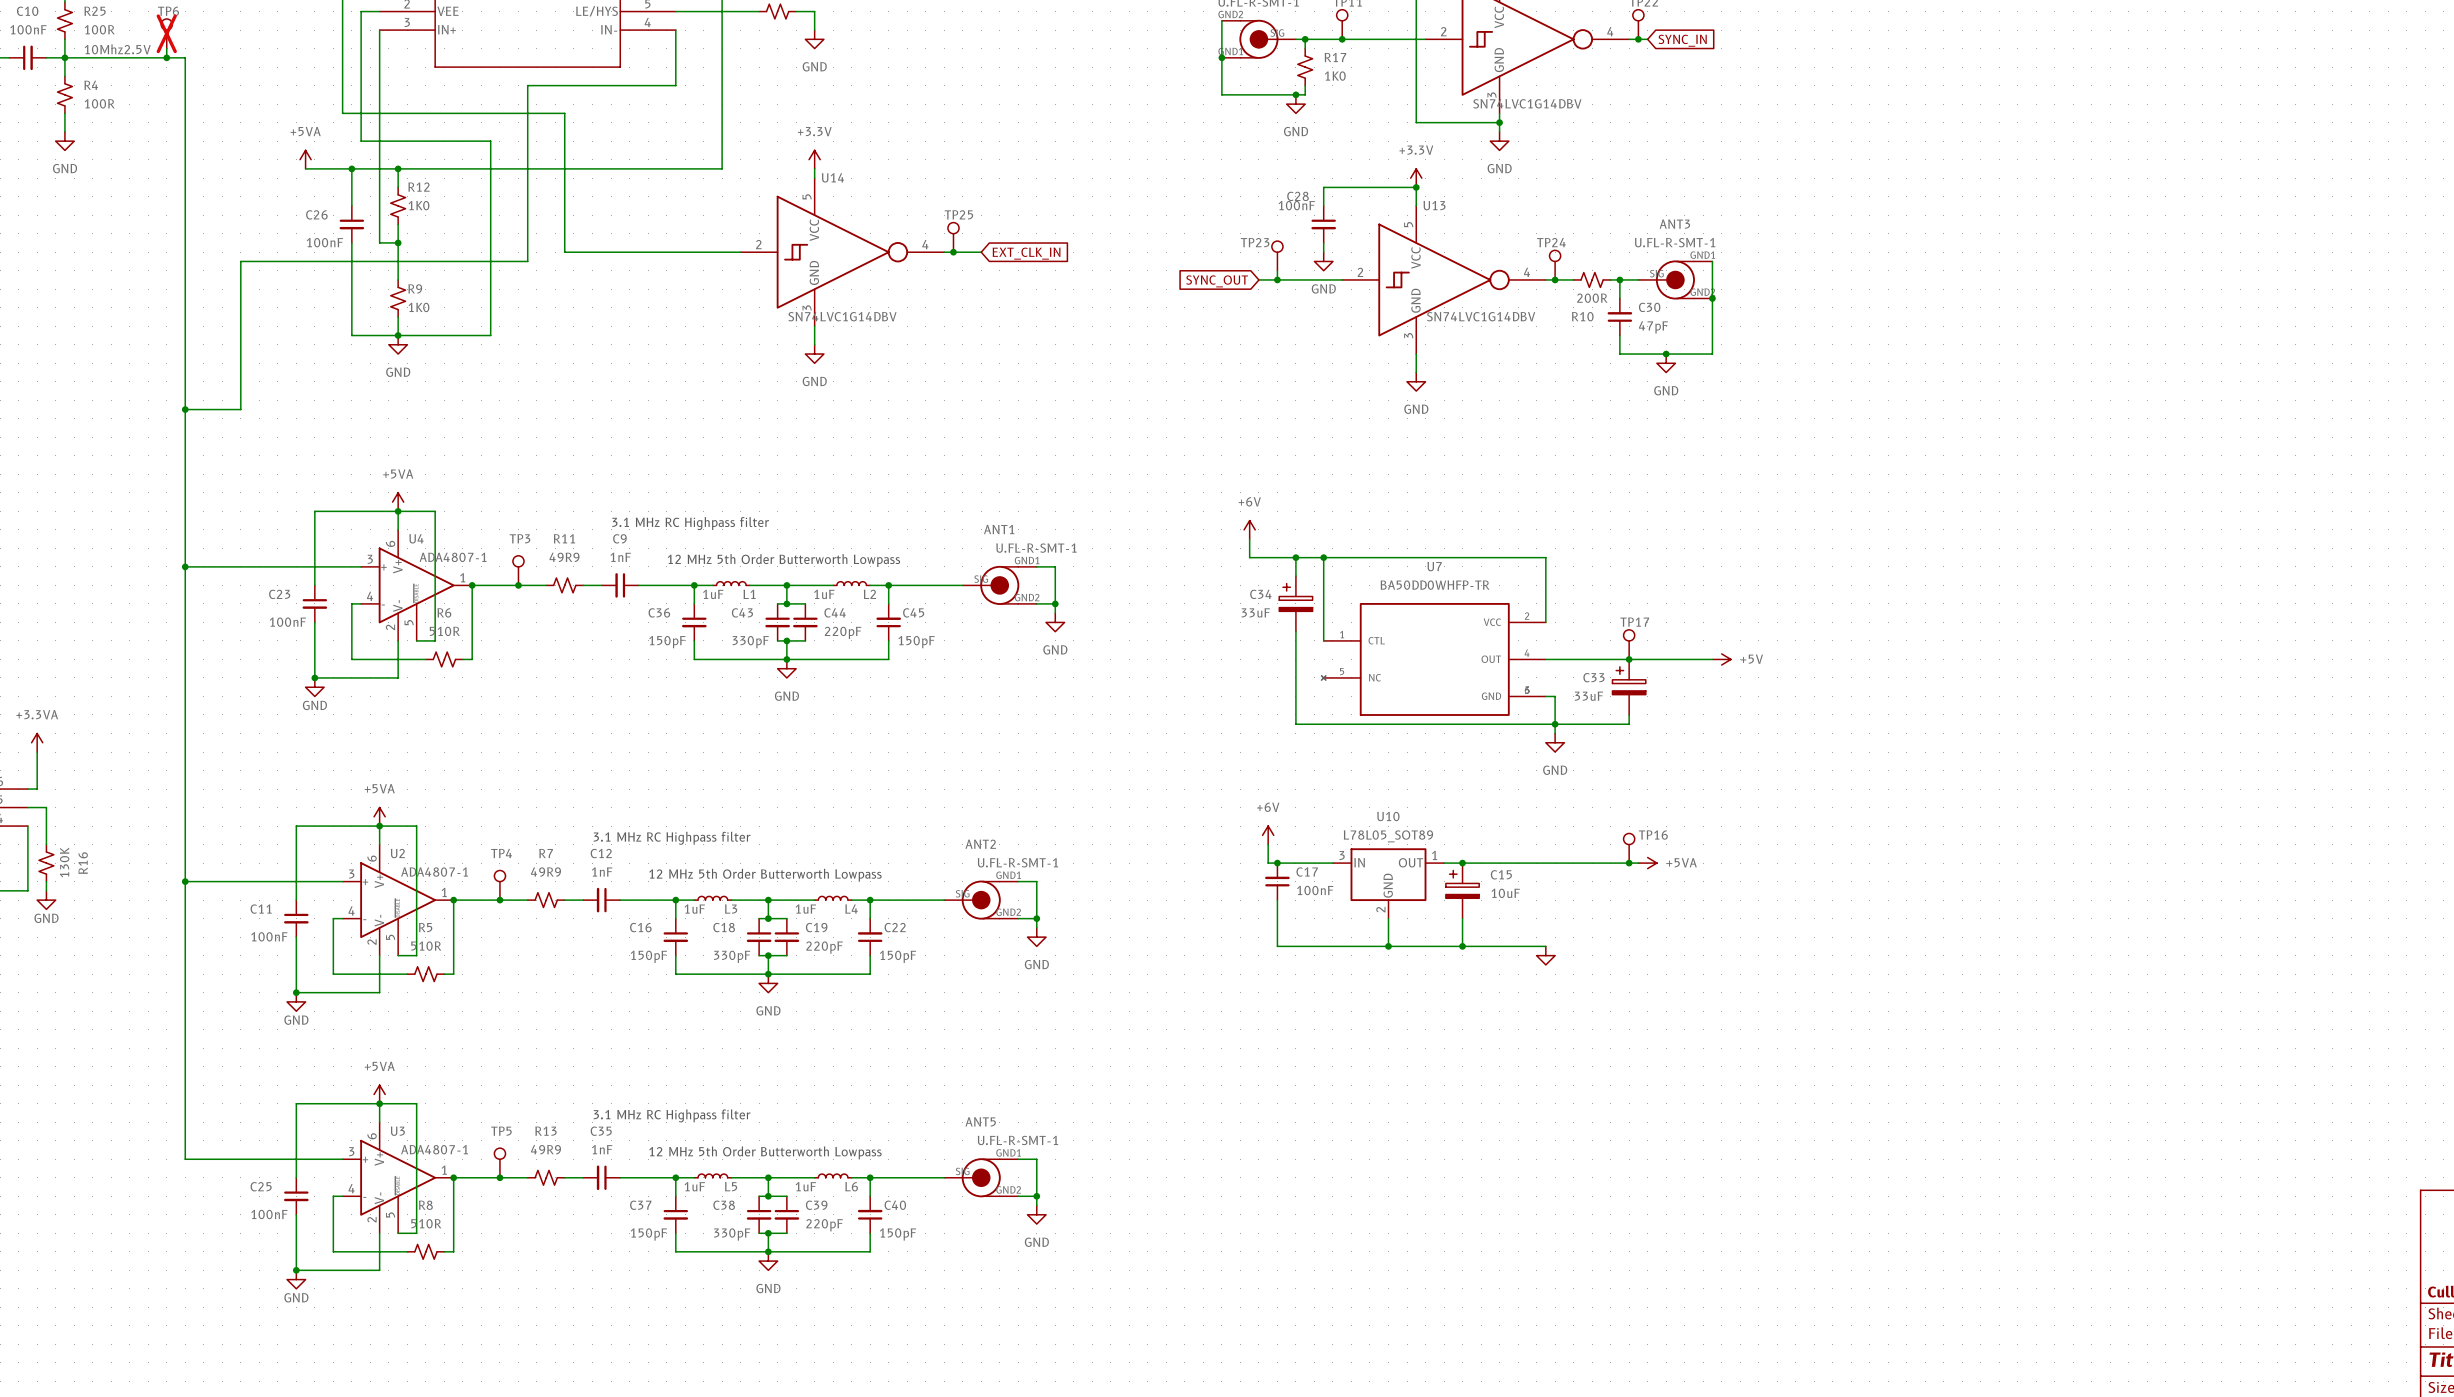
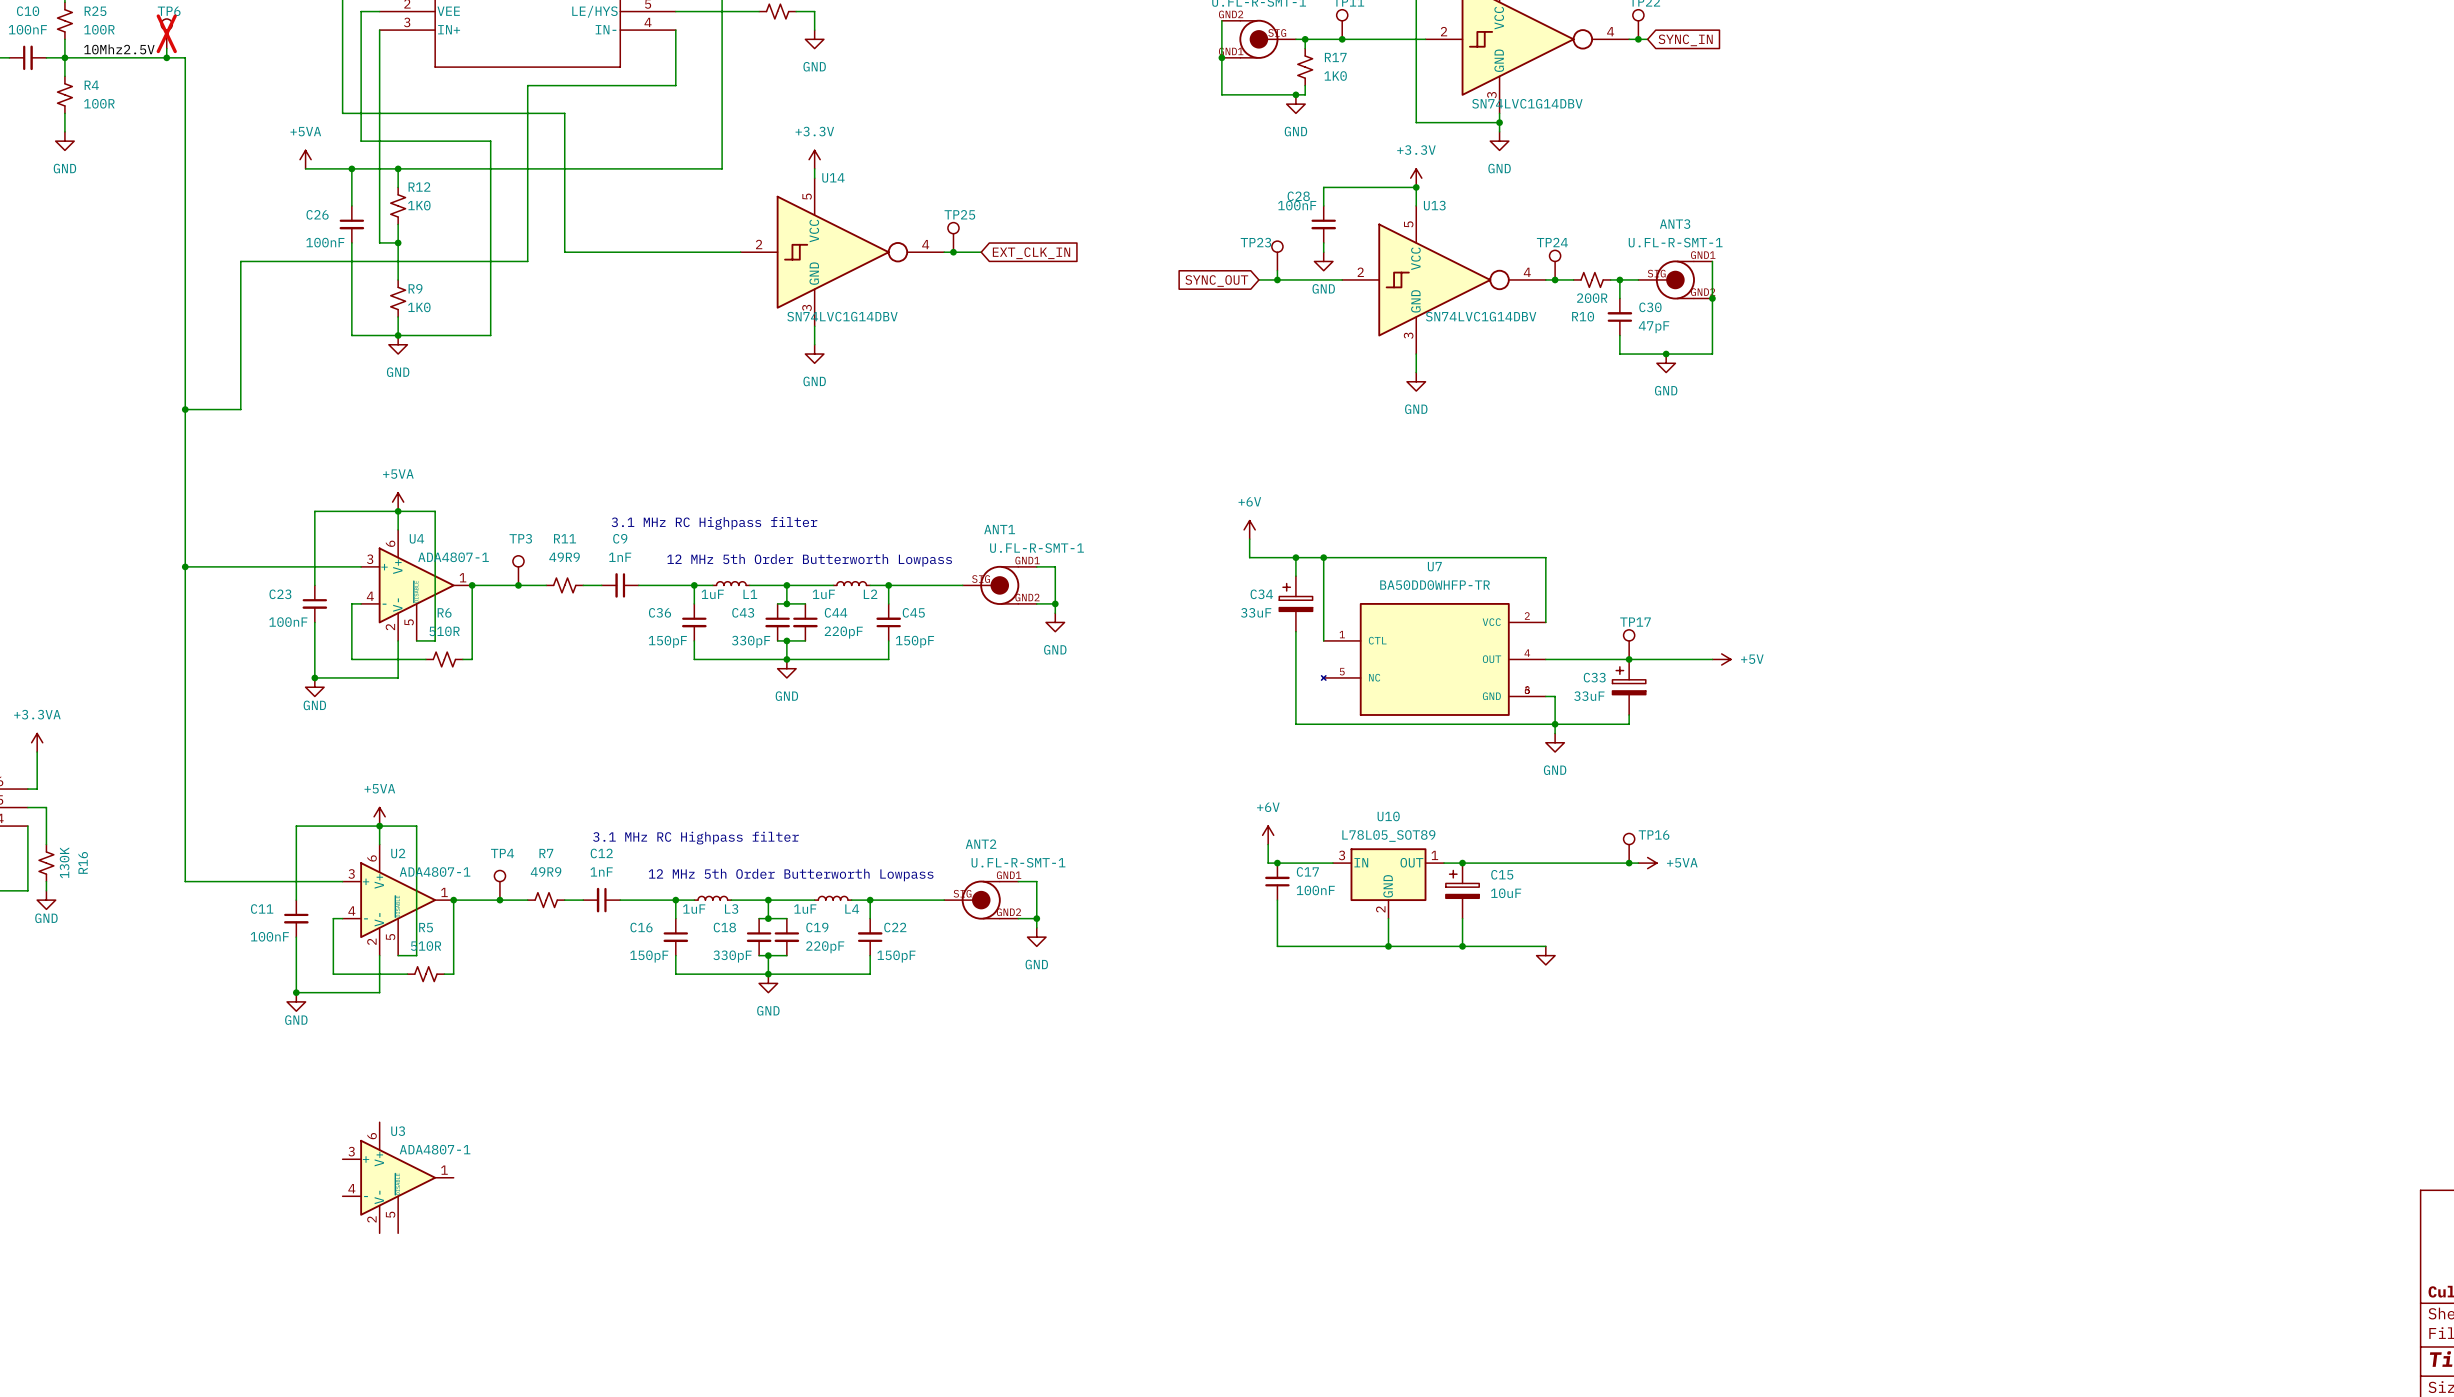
wire: (185, 881) (185, 1159) (342, 1159) -> none
junction: (185, 881) -> none
power symbol: +5VA (379, 1094) -> none
wire: (379, 1103) (379, 1122) -> none
junction: (379, 1103) -> none
text: 3.1 MHz RC Highpass filter (672, 1115) -> none
text: 12 MHz 5th Order Butterworth Lowpass (765, 1152) -> none
wire: (1018, 1159) (1036, 1159) (1036, 1205) -> none
TP5: (499, 1162) -> none
L5: 1uF (712, 1175) -> none
L6: 1uF (833, 1175) -> none
wire: (296, 1177) (296, 1103) (416, 1103) (416, 1233) (398, 1233) -> none
junction: (453, 1177) -> none
junction: (499, 1177) -> none
wire: (527, 1177) (453, 1177) (453, 1251) (444, 1251) -> none
R13: 49R9 (546, 1177) -> none
wire: (564, 1177) (583, 1177) -> none
C35: 1nF (601, 1177) -> none
wire: (620, 1177) (694, 1177) -> none
wire: (675, 1177) (675, 1196) -> none
junction: (675, 1177) -> none
wire: (731, 1177) (814, 1177) -> none
wire: (768, 1177) (768, 1196) -> none
junction: (768, 1177) -> none
wire: (851, 1177) (944, 1177) -> none
wire: (870, 1177) (870, 1196) -> none
junction: (870, 1177) -> none
ANT5: U.FL-R-SMT-1 (981, 1177) -> none
C25: 100nF (296, 1196) -> none
wire: (342, 1196) (333, 1196) (333, 1251) (407, 1251) -> none
wire: (759, 1196) (786, 1196) -> none
junction: (768, 1196) -> none
wire: (1018, 1196) (1036, 1196) -> none
junction: (1036, 1196) -> none
wire: (296, 1214) (296, 1270) (379, 1270) (379, 1233) -> none
C37: 150pF (675, 1214) -> none
C38: 330pF (759, 1214) -> none
C39: 220pF (786, 1214) -> none
C40: 150pF (870, 1214) -> none
power symbol: GND (1036, 1214) -> none
wire: (675, 1233) (675, 1251) (870, 1251) (870, 1233) -> none
wire: (759, 1233) (786, 1233) -> none
wire: (768, 1233) (768, 1251) -> none
junction: (768, 1233) -> none
R8: 510R (425, 1251) -> none
junction: (768, 1251) -> none
power symbol: GND (768, 1261) -> none
junction: (296, 1270) -> none
power symbol: GND (296, 1279) -> none

